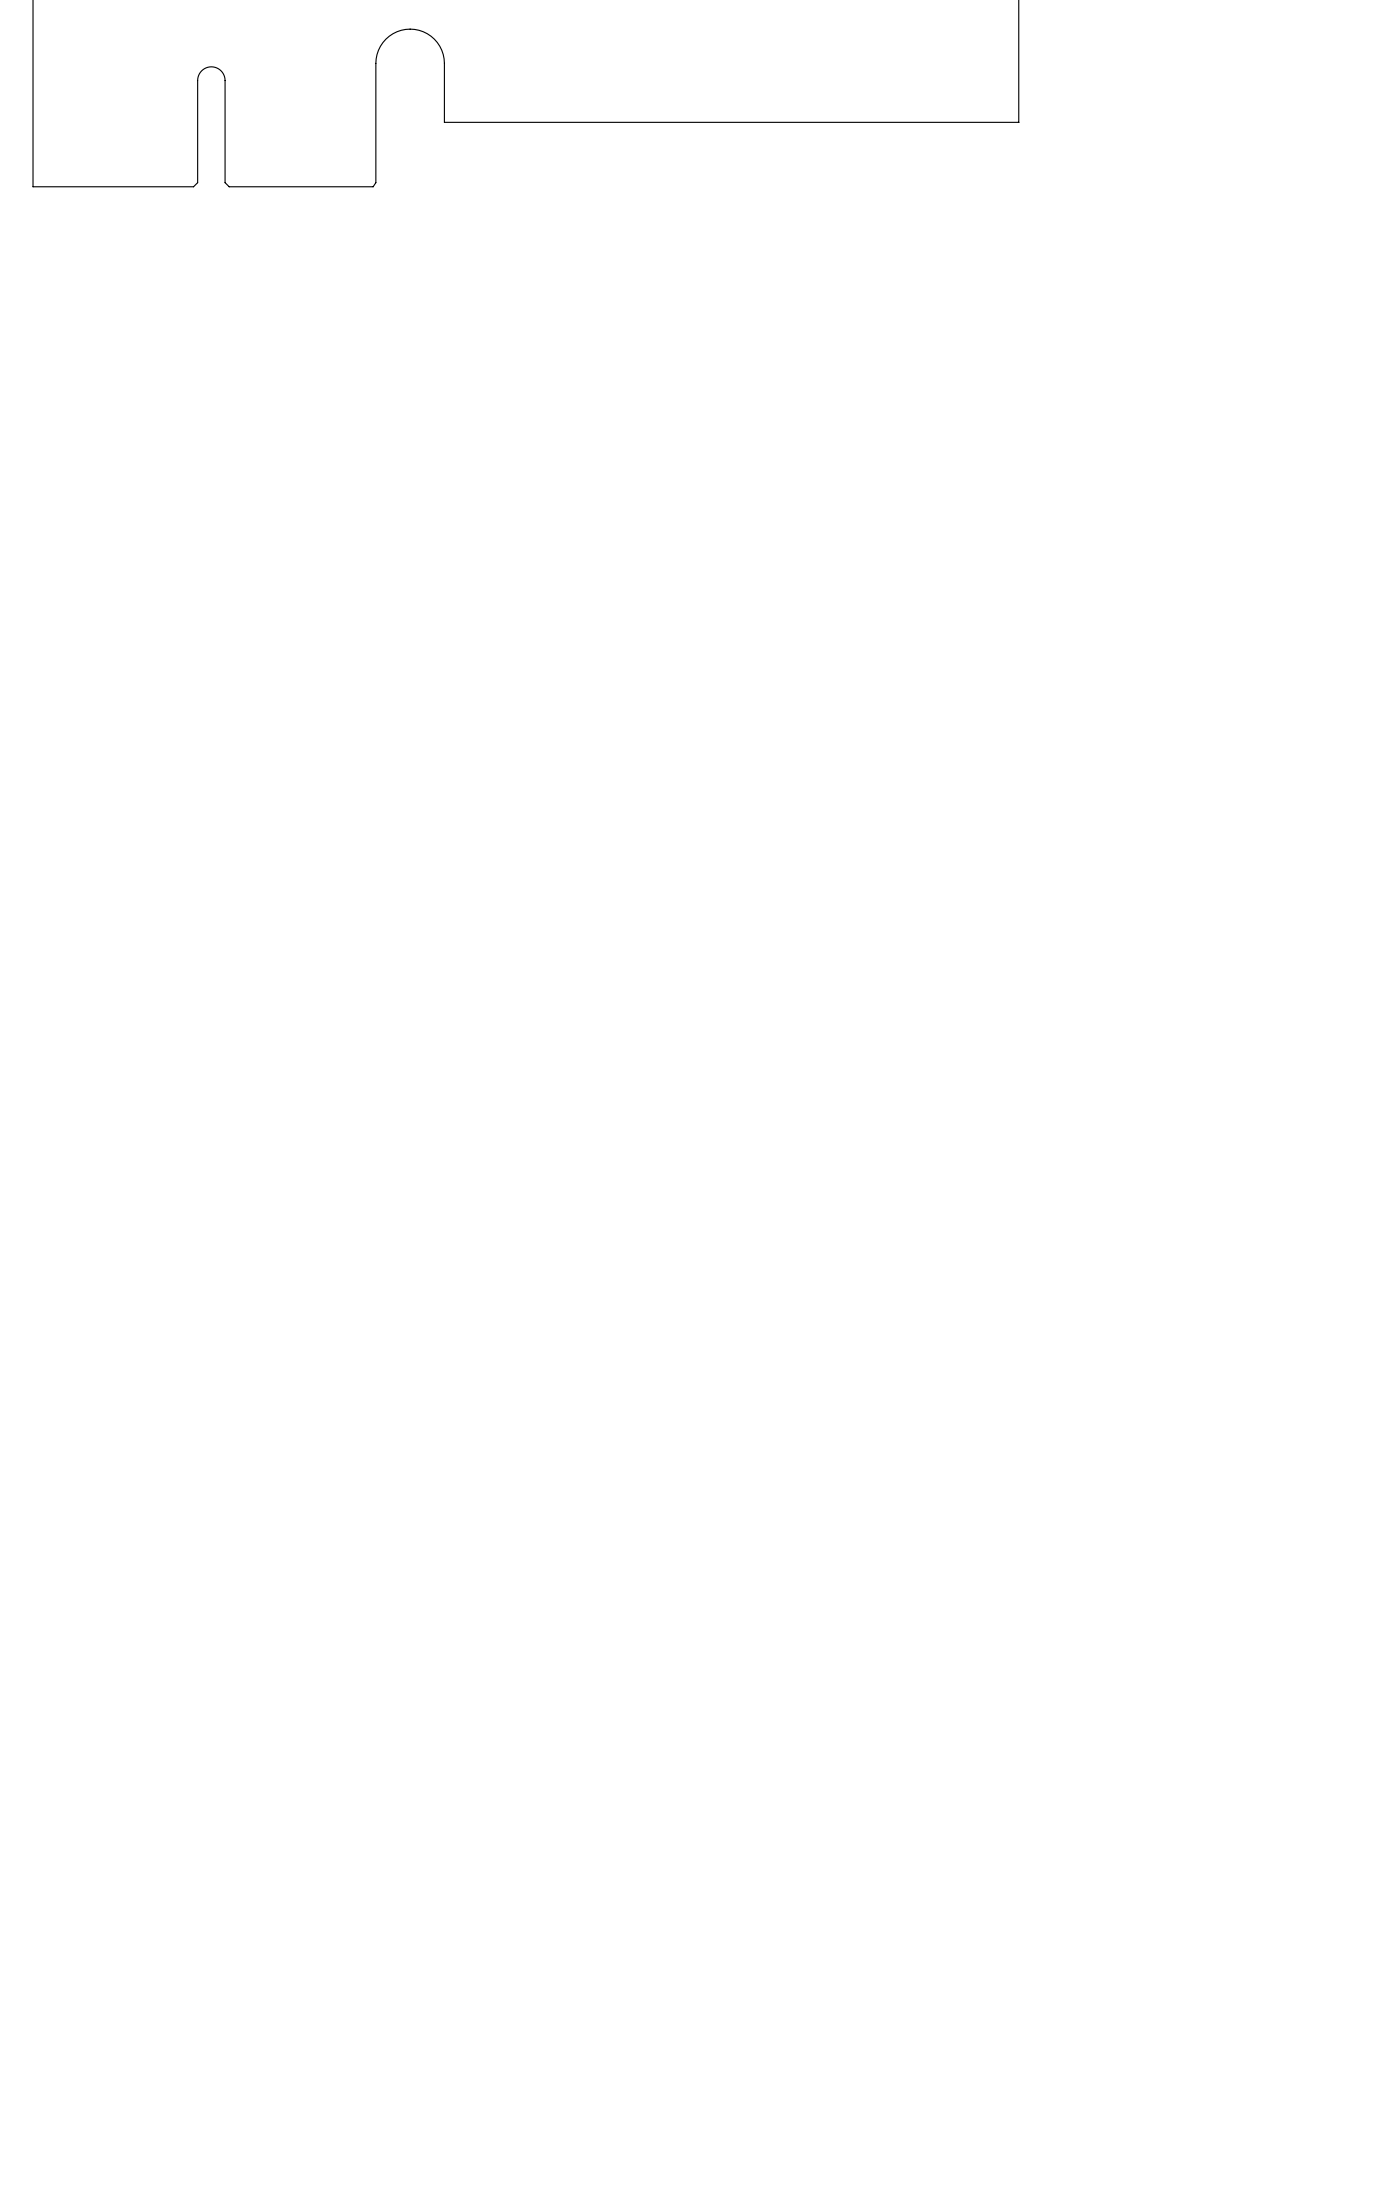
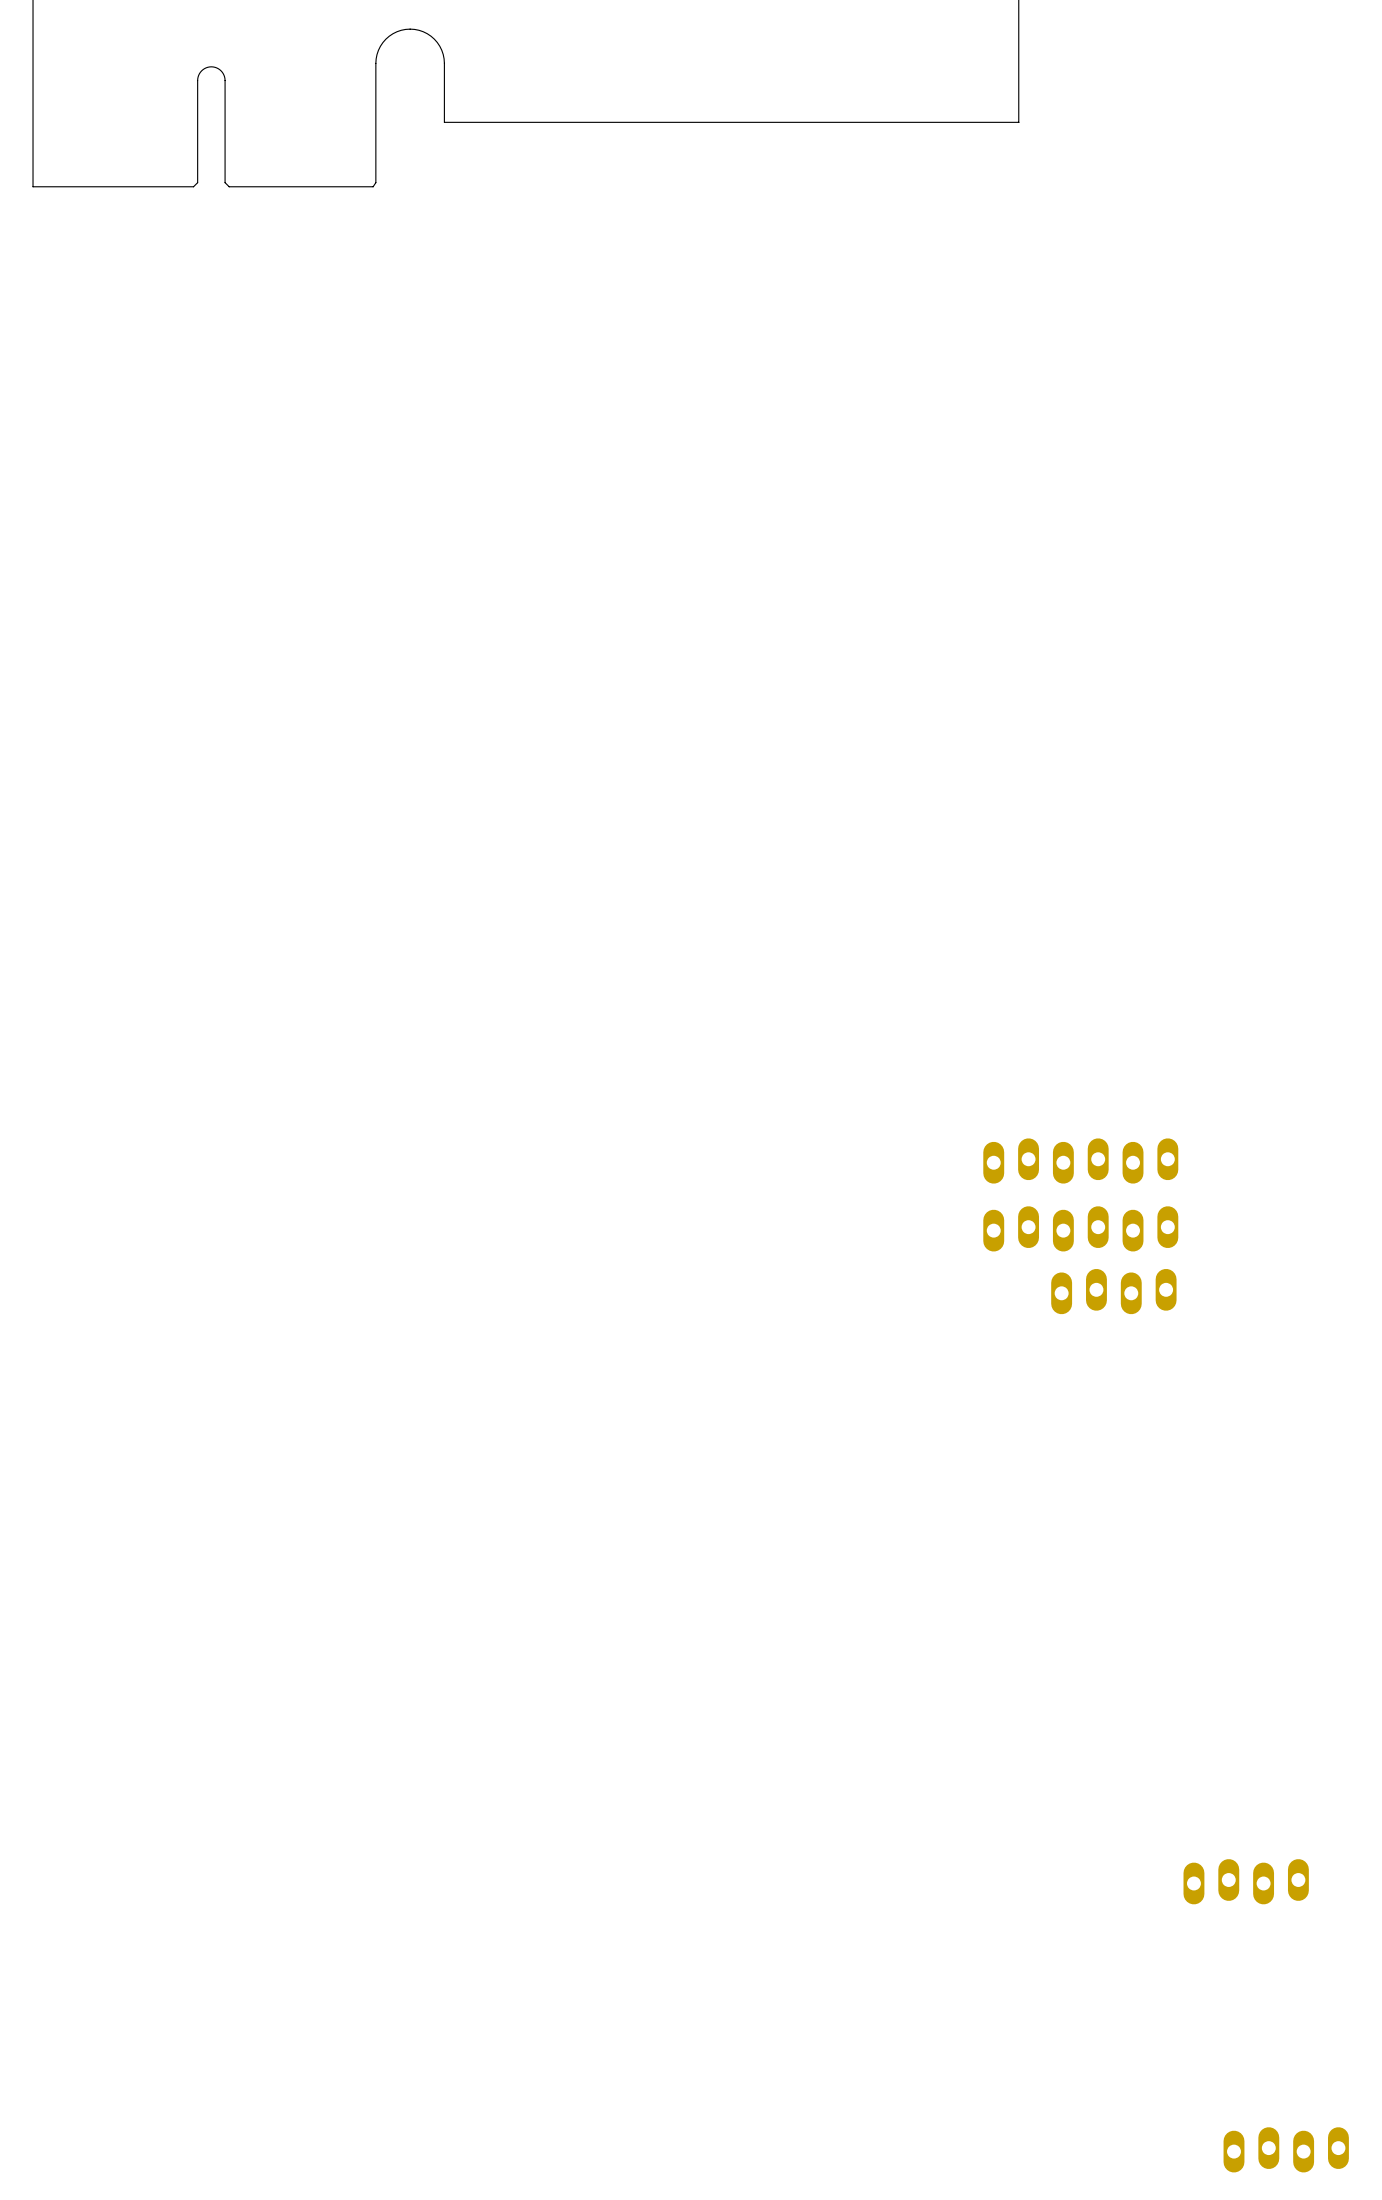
part: none -> (1080, 1161)
part: none -> (1080, 1228)
part: none -> (1113, 1291)
part: none -> (1246, 1881)
part: none -> (1286, 2149)

